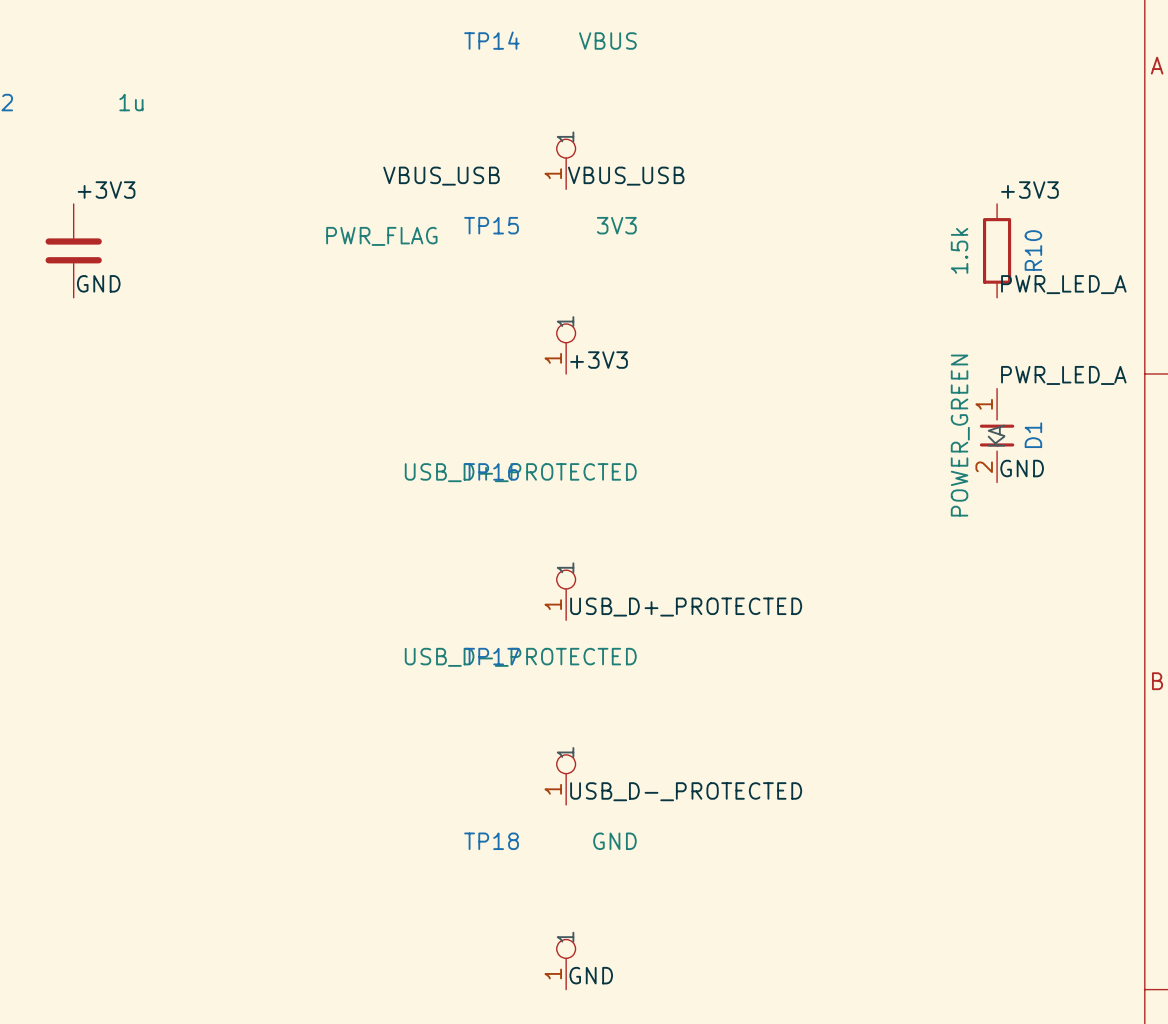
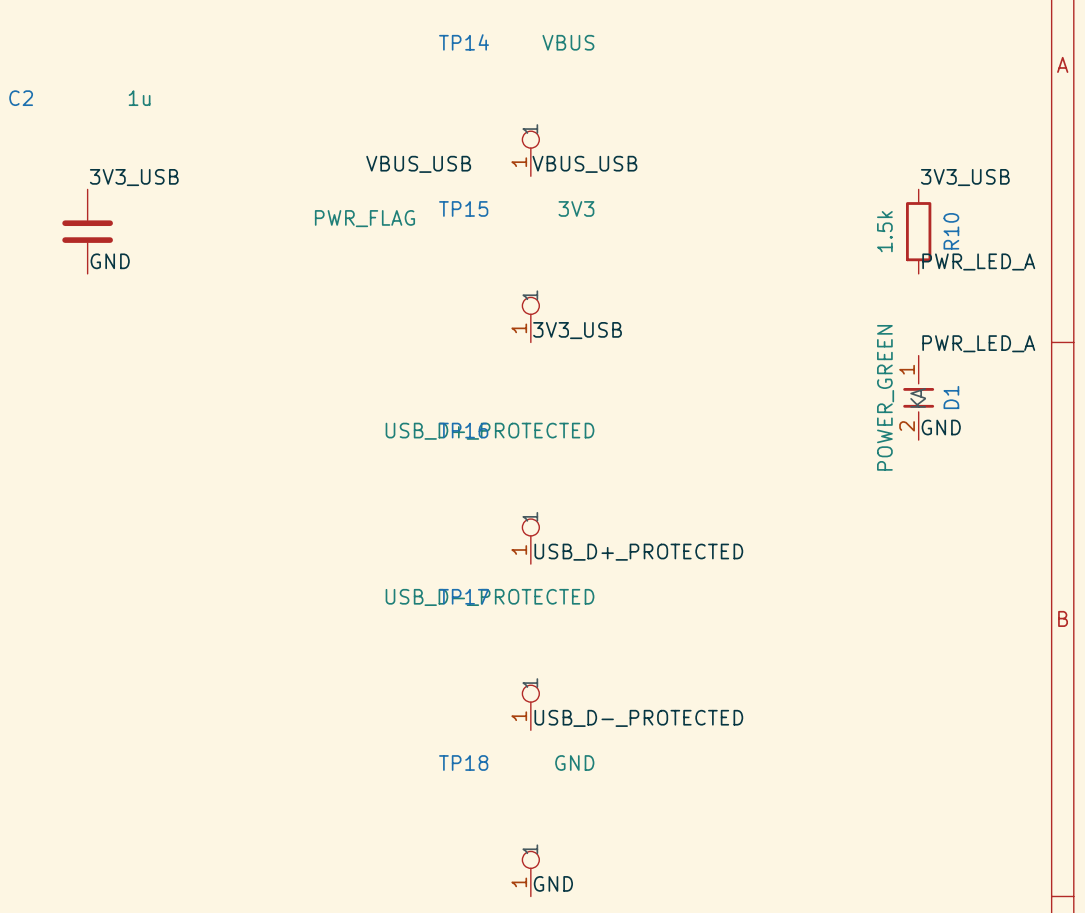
label: +3V3 (106, 190) -> 3V3_USB (134, 177)
label: +3V3 (1029, 190) -> 3V3_USB (965, 177)
label: +3V3 (599, 360) -> 3V3_USB (577, 330)

